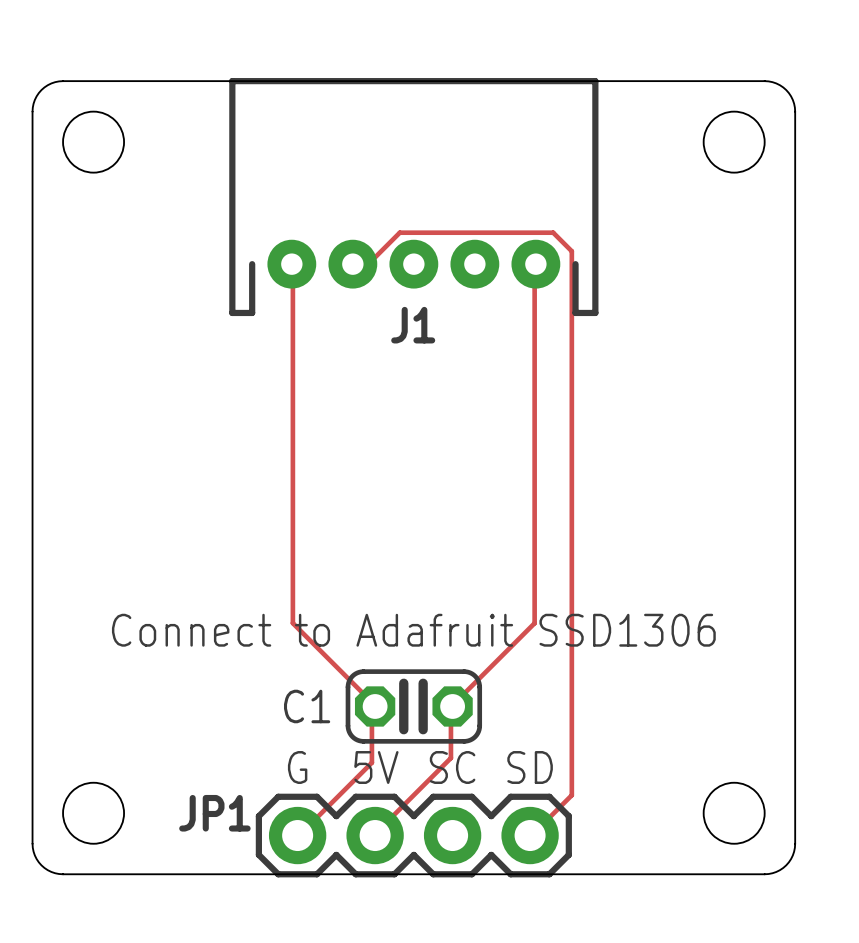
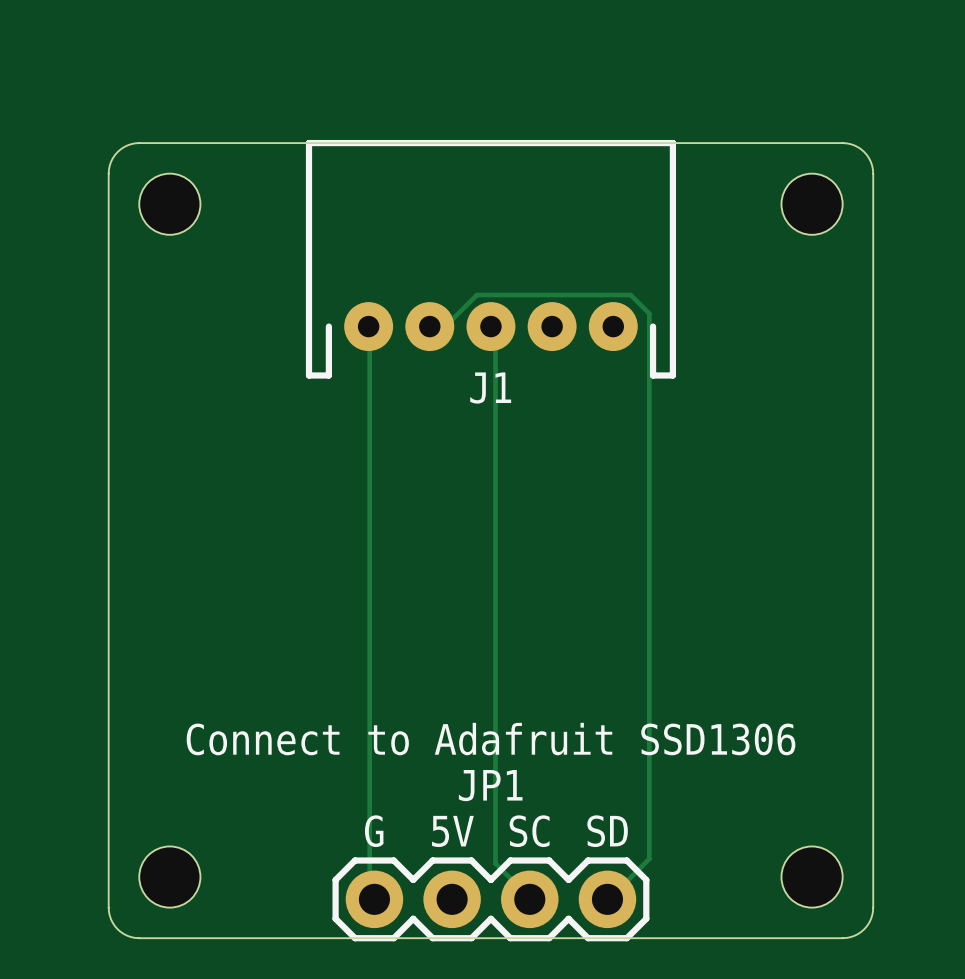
track: none -> (490, 326) (495, 327) (495, 863) (529, 899)
track: (535, 264) (534, 623) (450, 706) (450, 758) (375, 835) -> none
track: (292, 623) (375, 706) (371, 706) (371, 762) (297, 835) -> (369, 686) (369, 891) (374, 896) (374, 899)
text position: Connect to Adafruit SSD1306 (413, 630) -> Connect to Adafruit SSD1306 (491, 739)
C1: (413, 706) -> none
JP1 name position: JP1 (214, 813) -> JP1 (490, 785)

